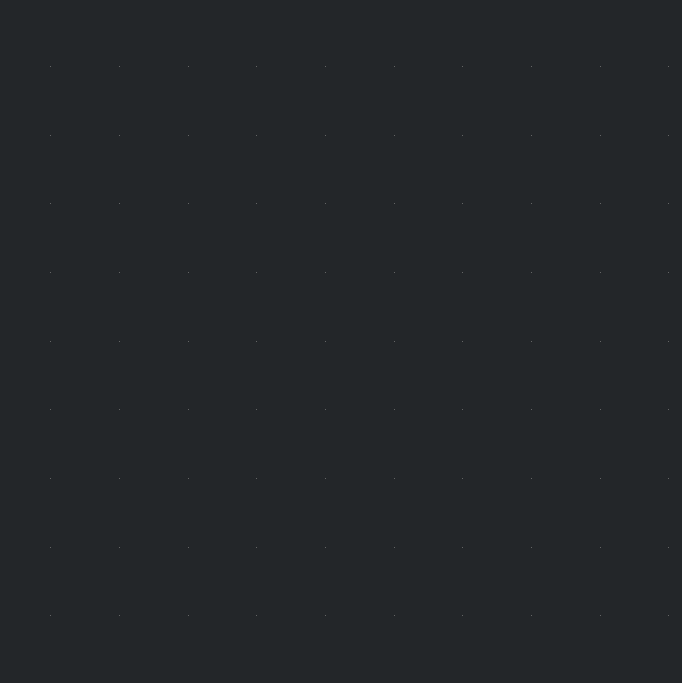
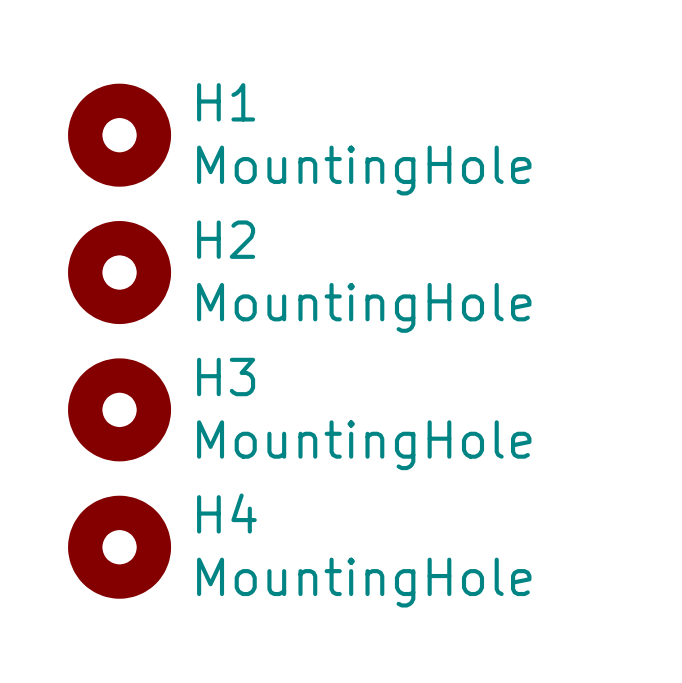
H1: none -> MountingHole (119, 135)
H2: none -> MountingHole (119, 272)
H3: none -> MountingHole (119, 409)
H4: none -> MountingHole (119, 547)

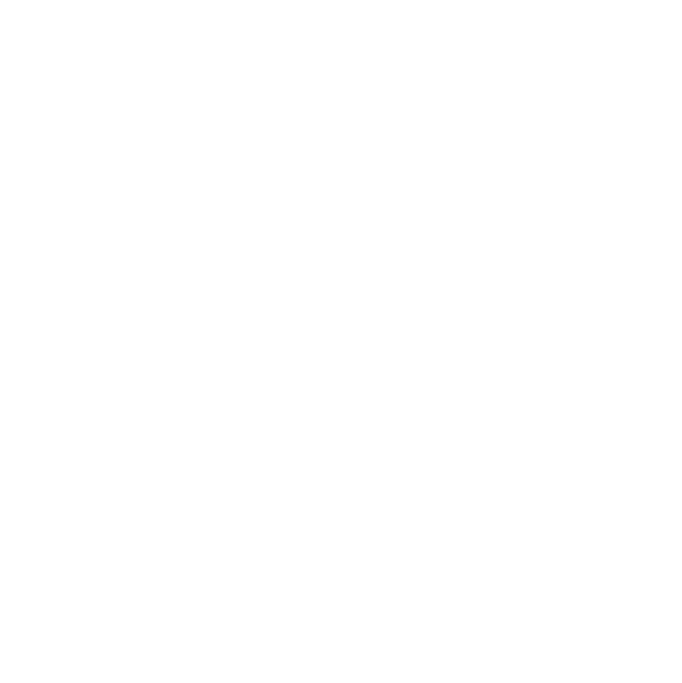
H1: MountingHole (119, 135) -> none
H2: MountingHole (119, 272) -> none
H3: MountingHole (119, 409) -> none
H4: MountingHole (119, 547) -> none

